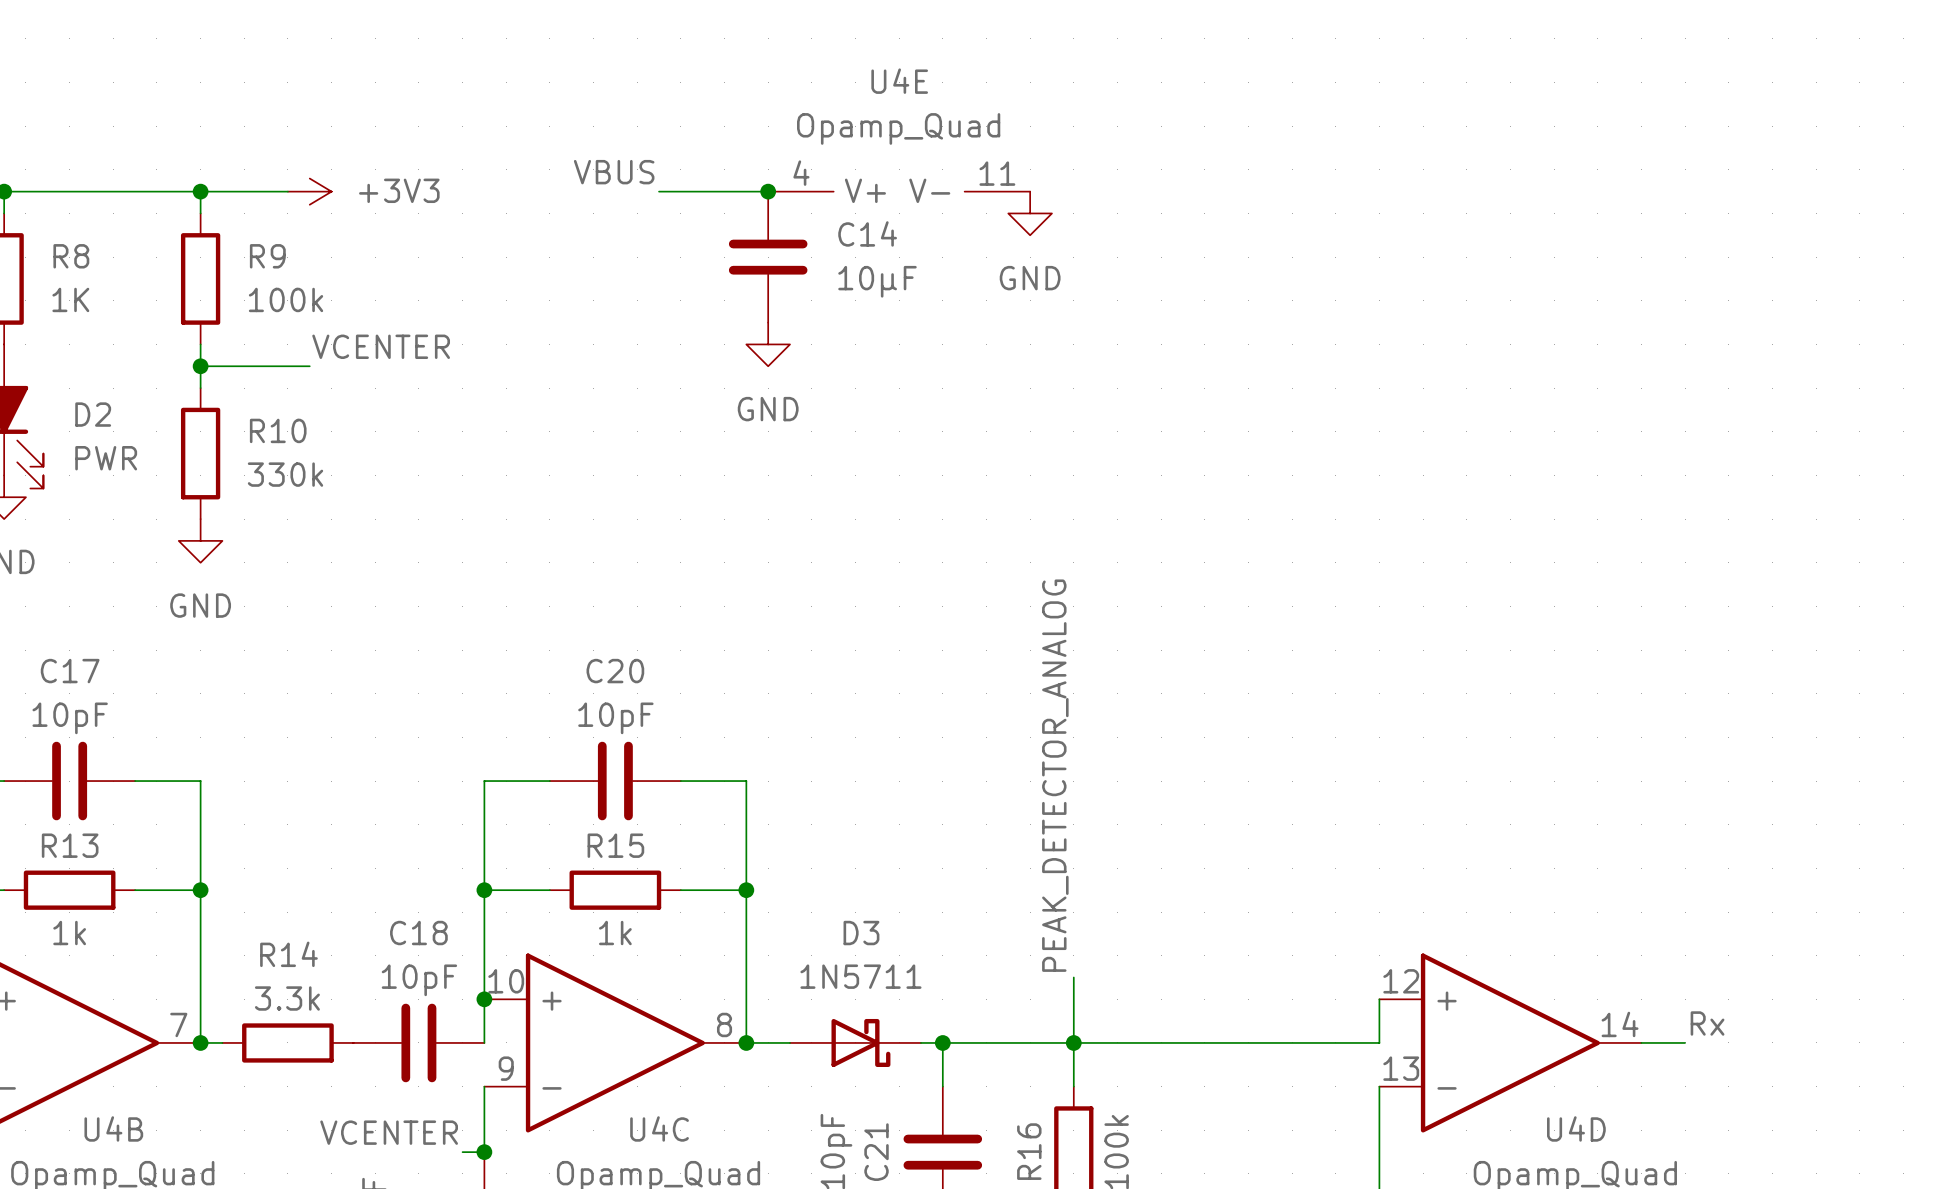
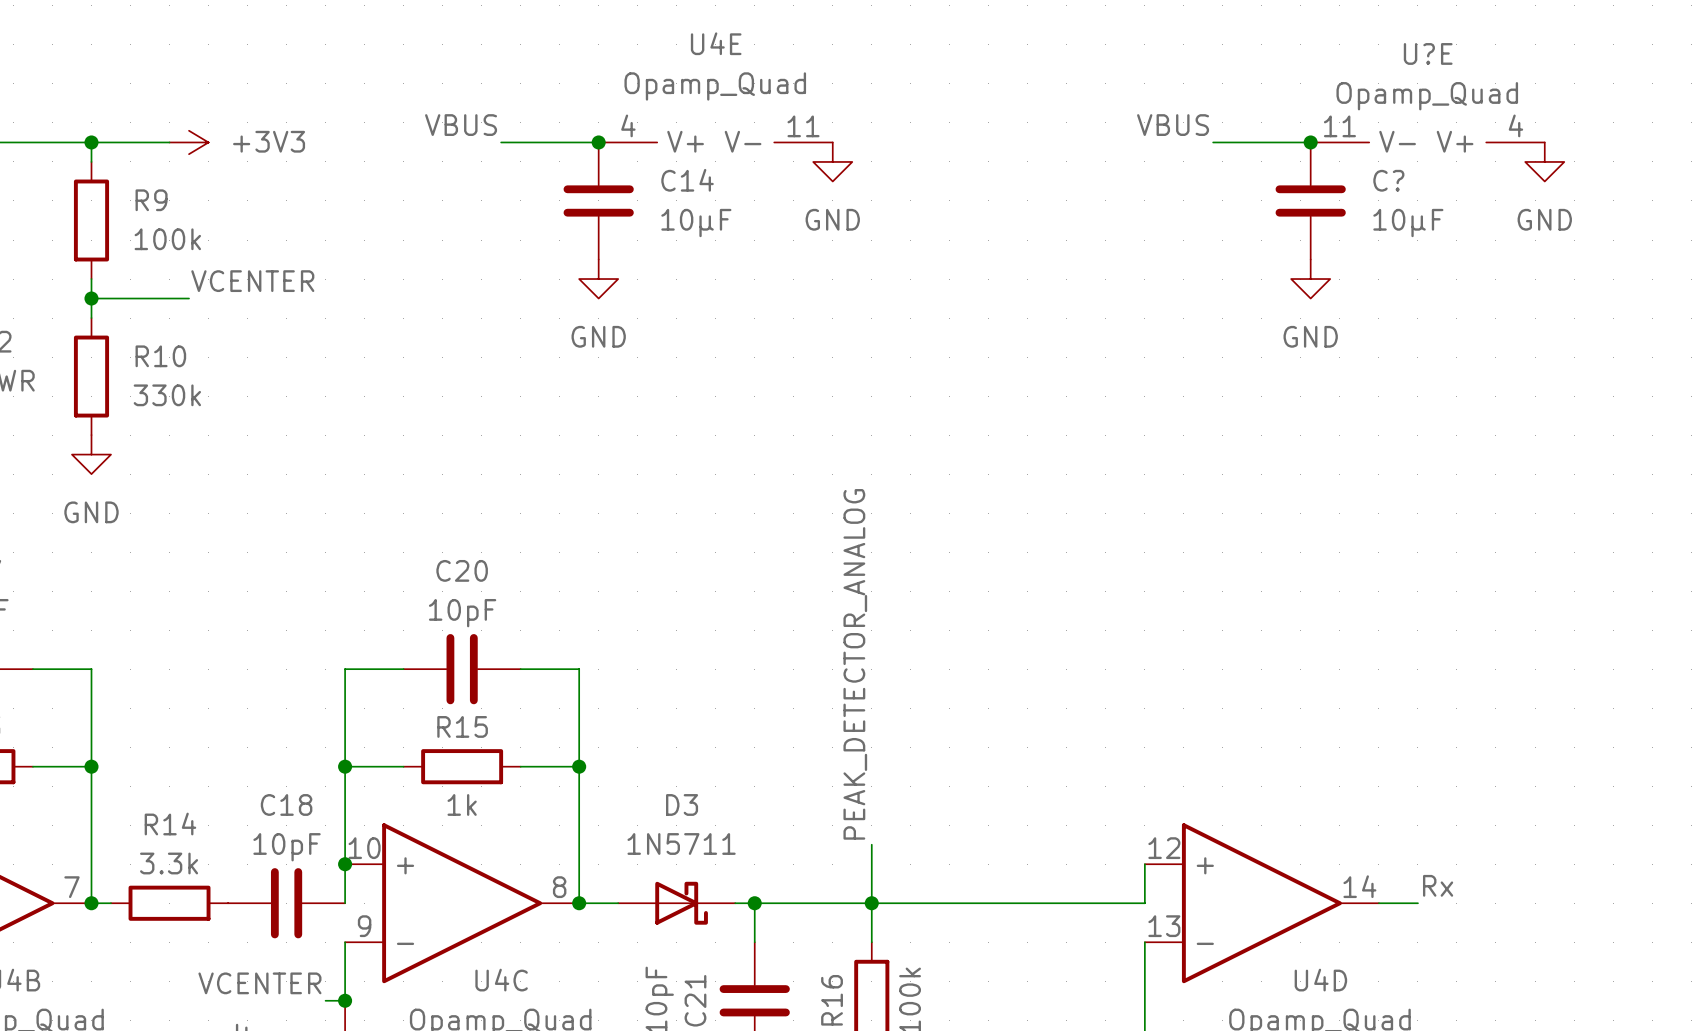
label: none -> VBUS (1173, 125)
wire: none -> (1213, 142) (1310, 142)
junction: none -> (1310, 142)
U?E: none -> Opamp_Quad (1427, 142)
power symbol: none -> GND (1544, 161)
C?: none -> 10µF (1310, 200)
power symbol: none -> GND (1310, 279)

